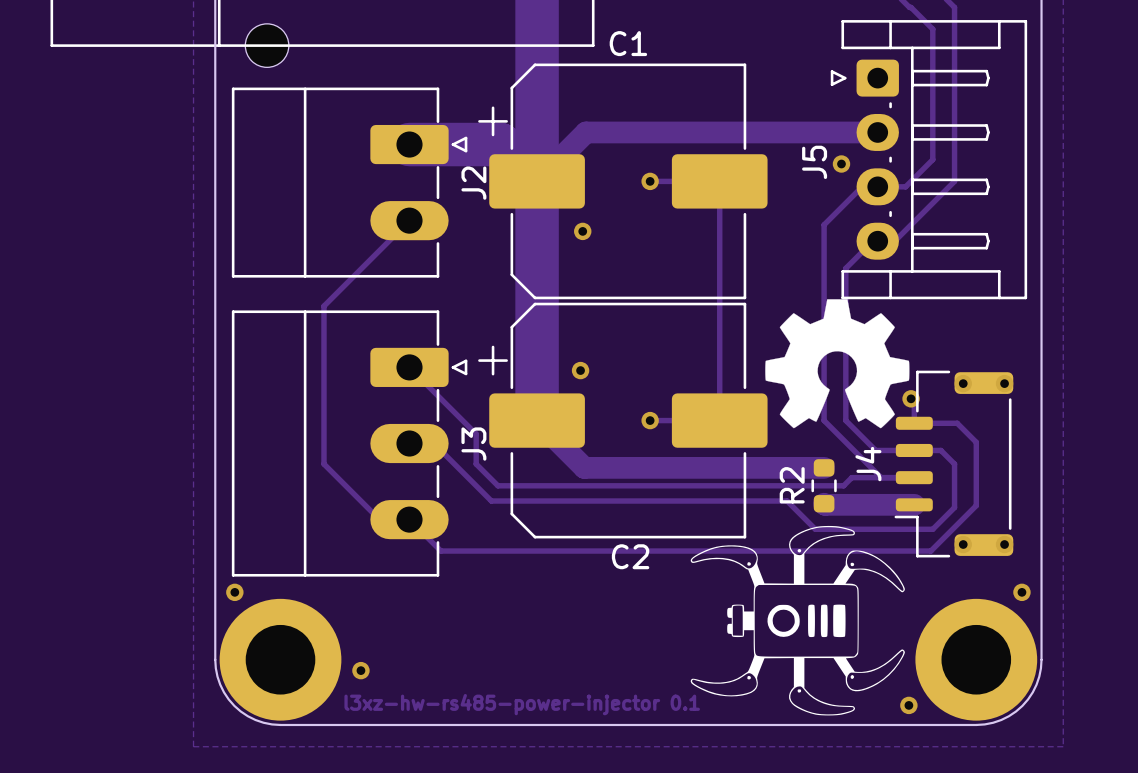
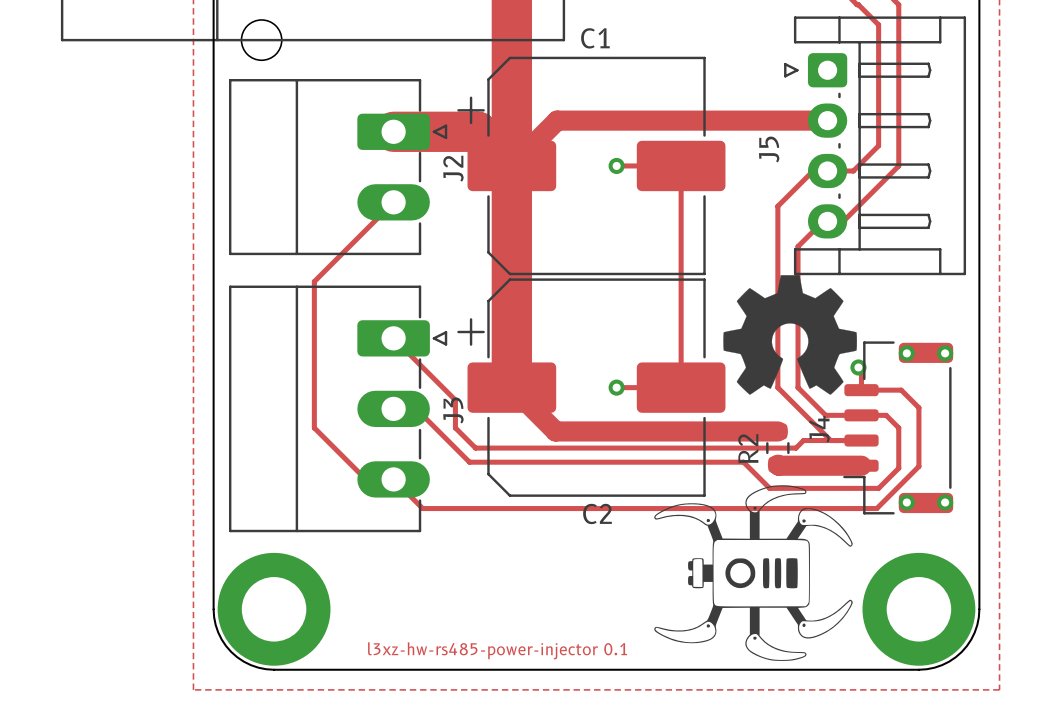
via: (841, 164) -> none
via: (582, 231) -> none
via: (580, 370) -> none
via: (234, 592) -> none
via: (1021, 592) -> none
via: (360, 670) -> none
via: (908, 705) -> none

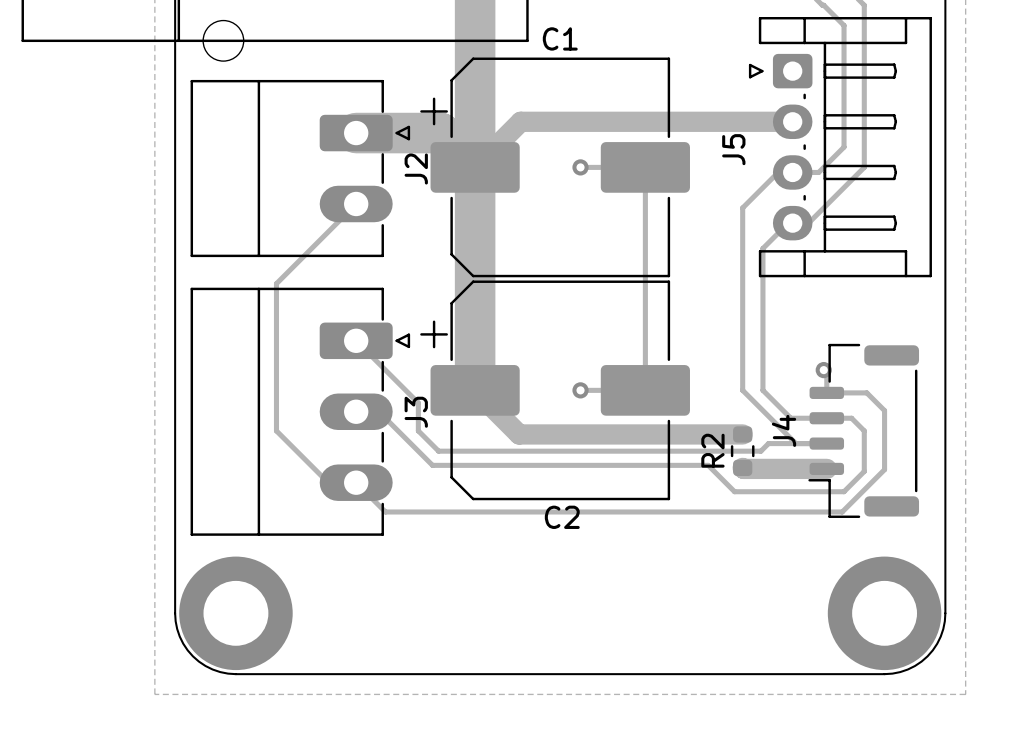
drawing: [723, 275, 857, 395] -> none
via: (906, 353) -> none
via: (945, 353) -> none
drawing: [654, 485, 853, 661] -> none
via: (906, 502) -> none
via: (945, 502) -> none
text: l3xz-hw-rs485-power-injector 0.1 (497, 650) -> none

